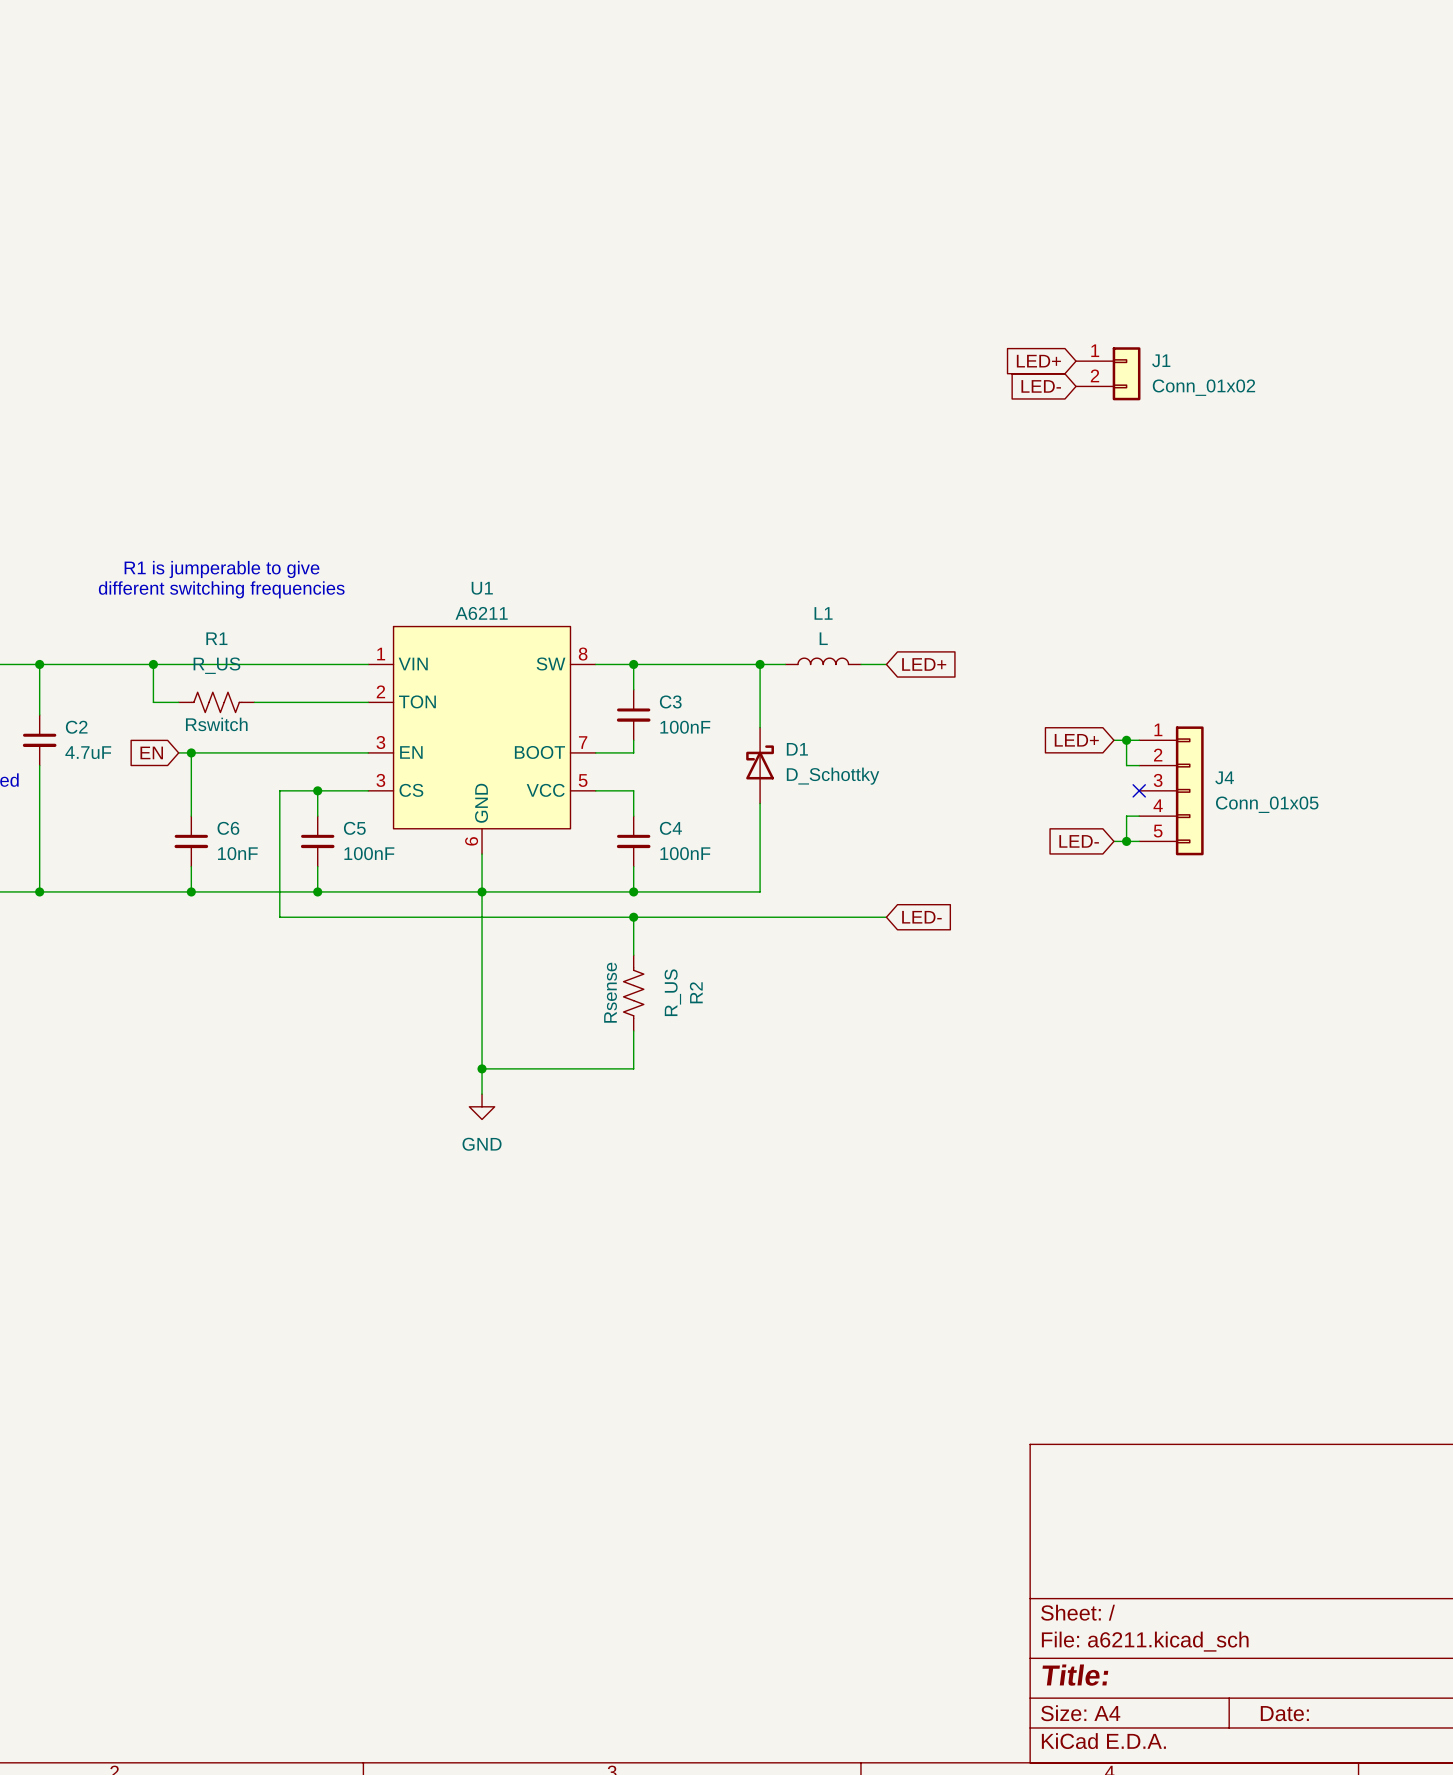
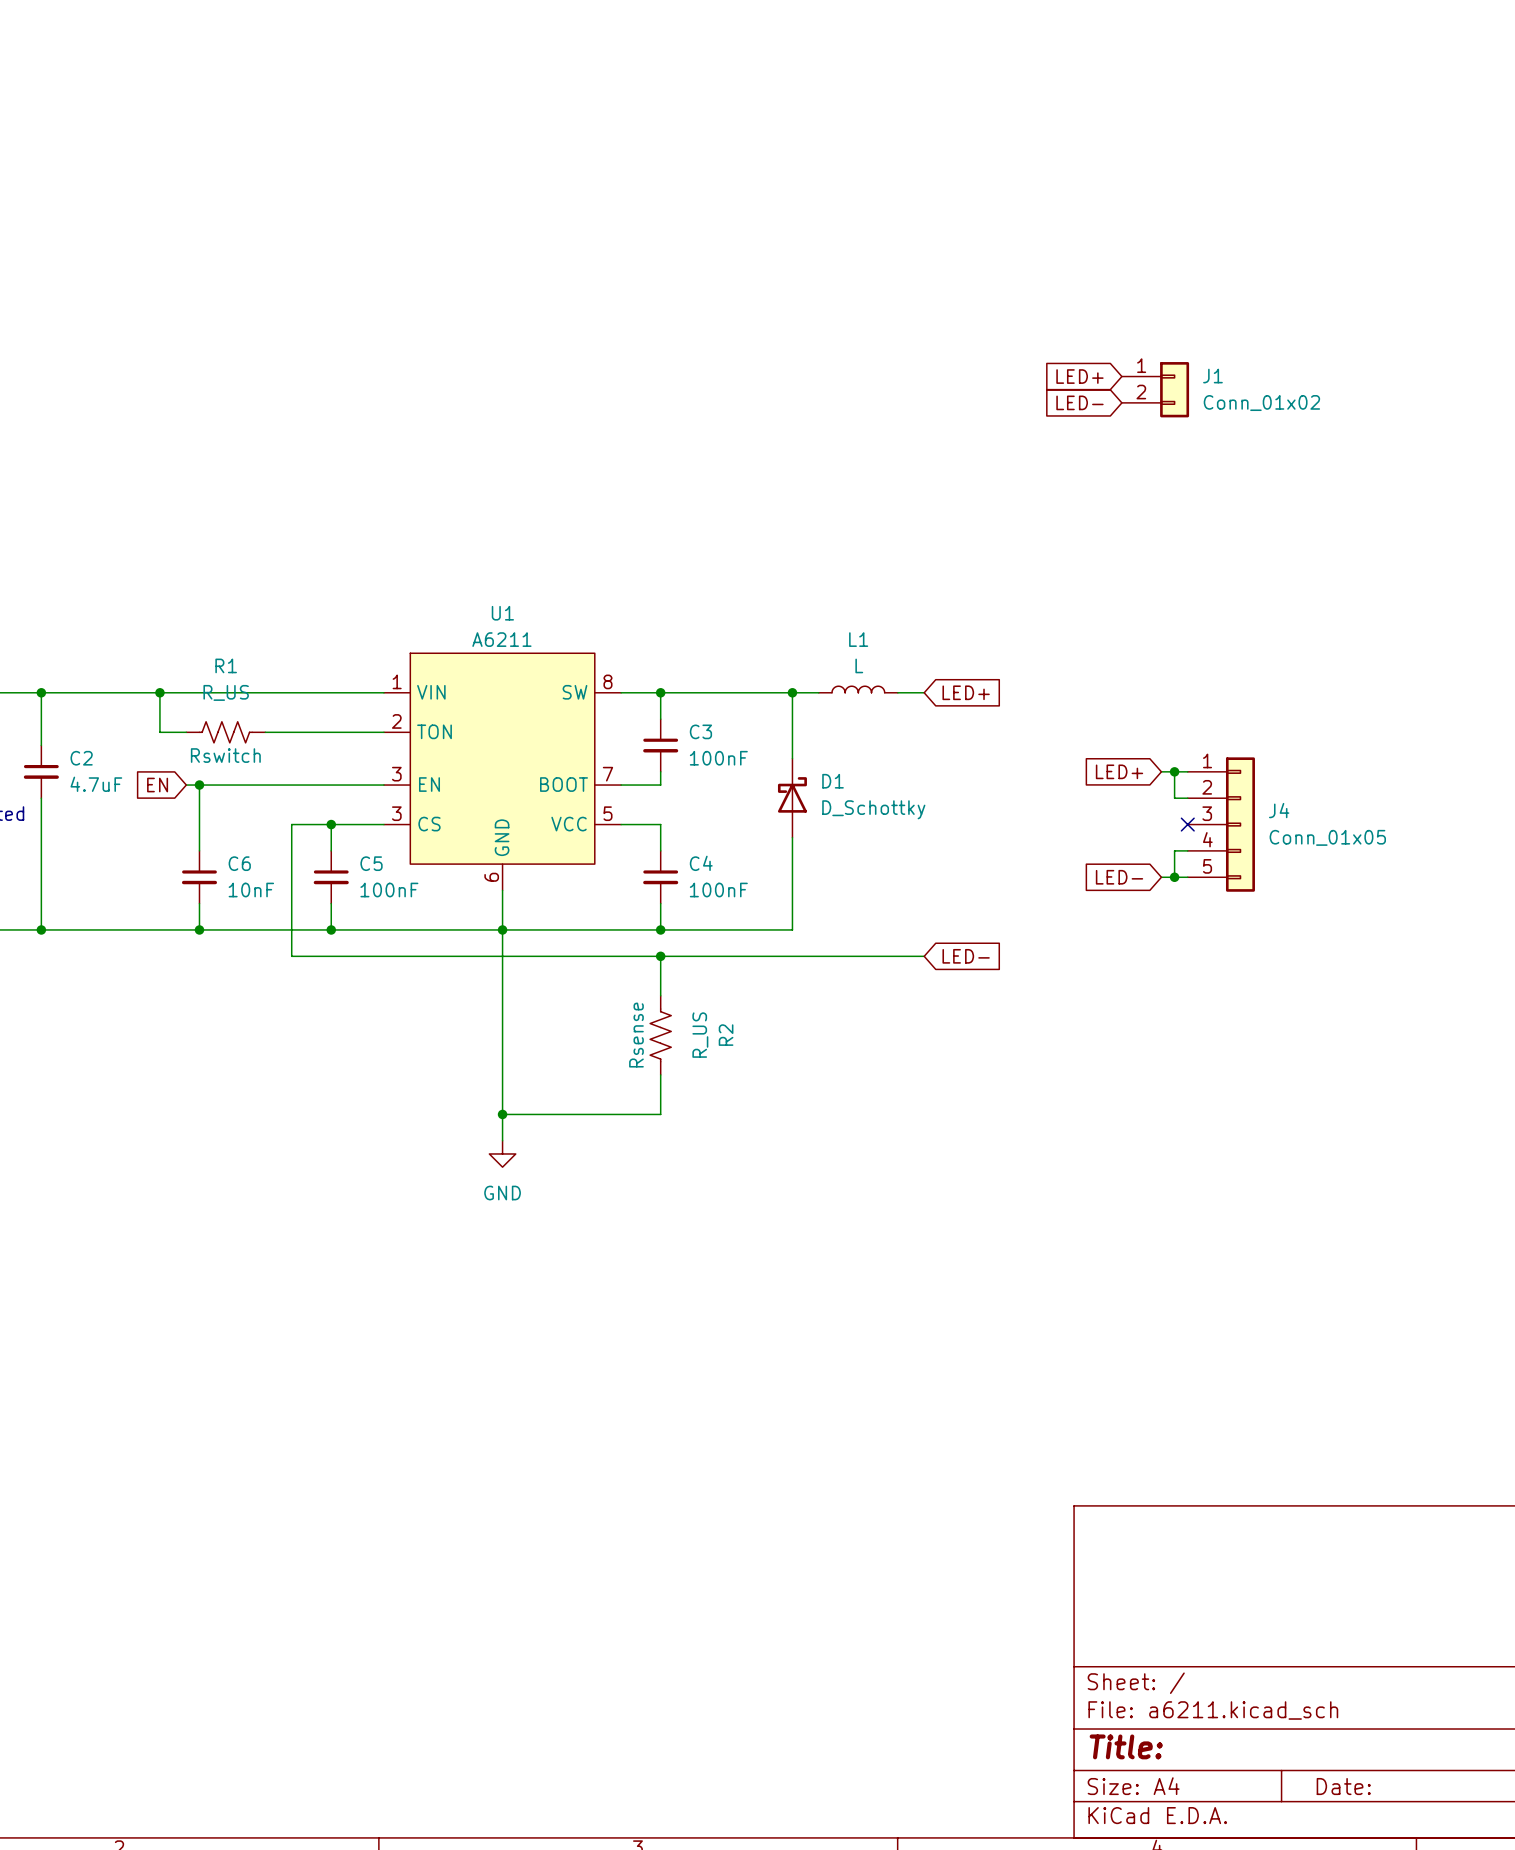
text: R1 is jumperable to give (222, 569) -> none
text: different switching frequencies (221, 589) -> none

